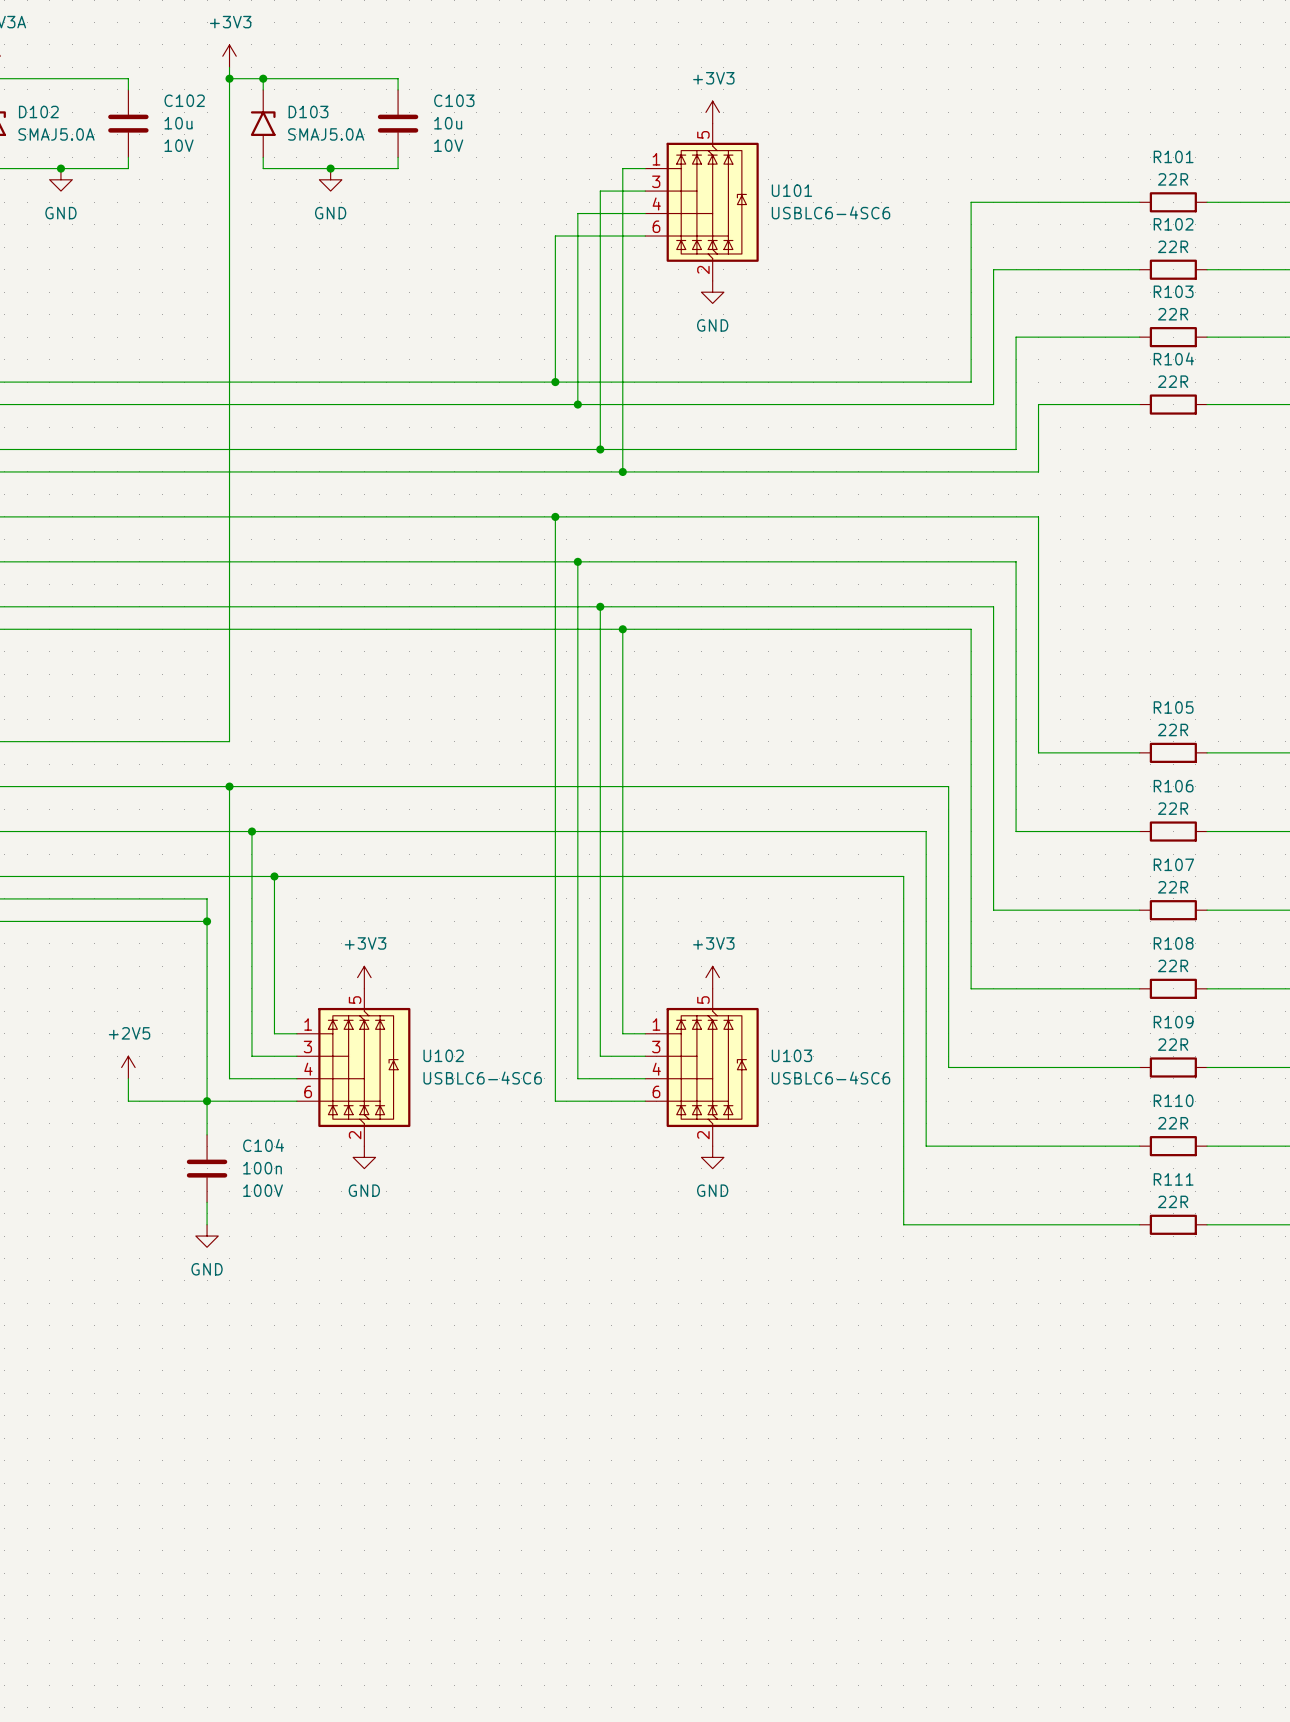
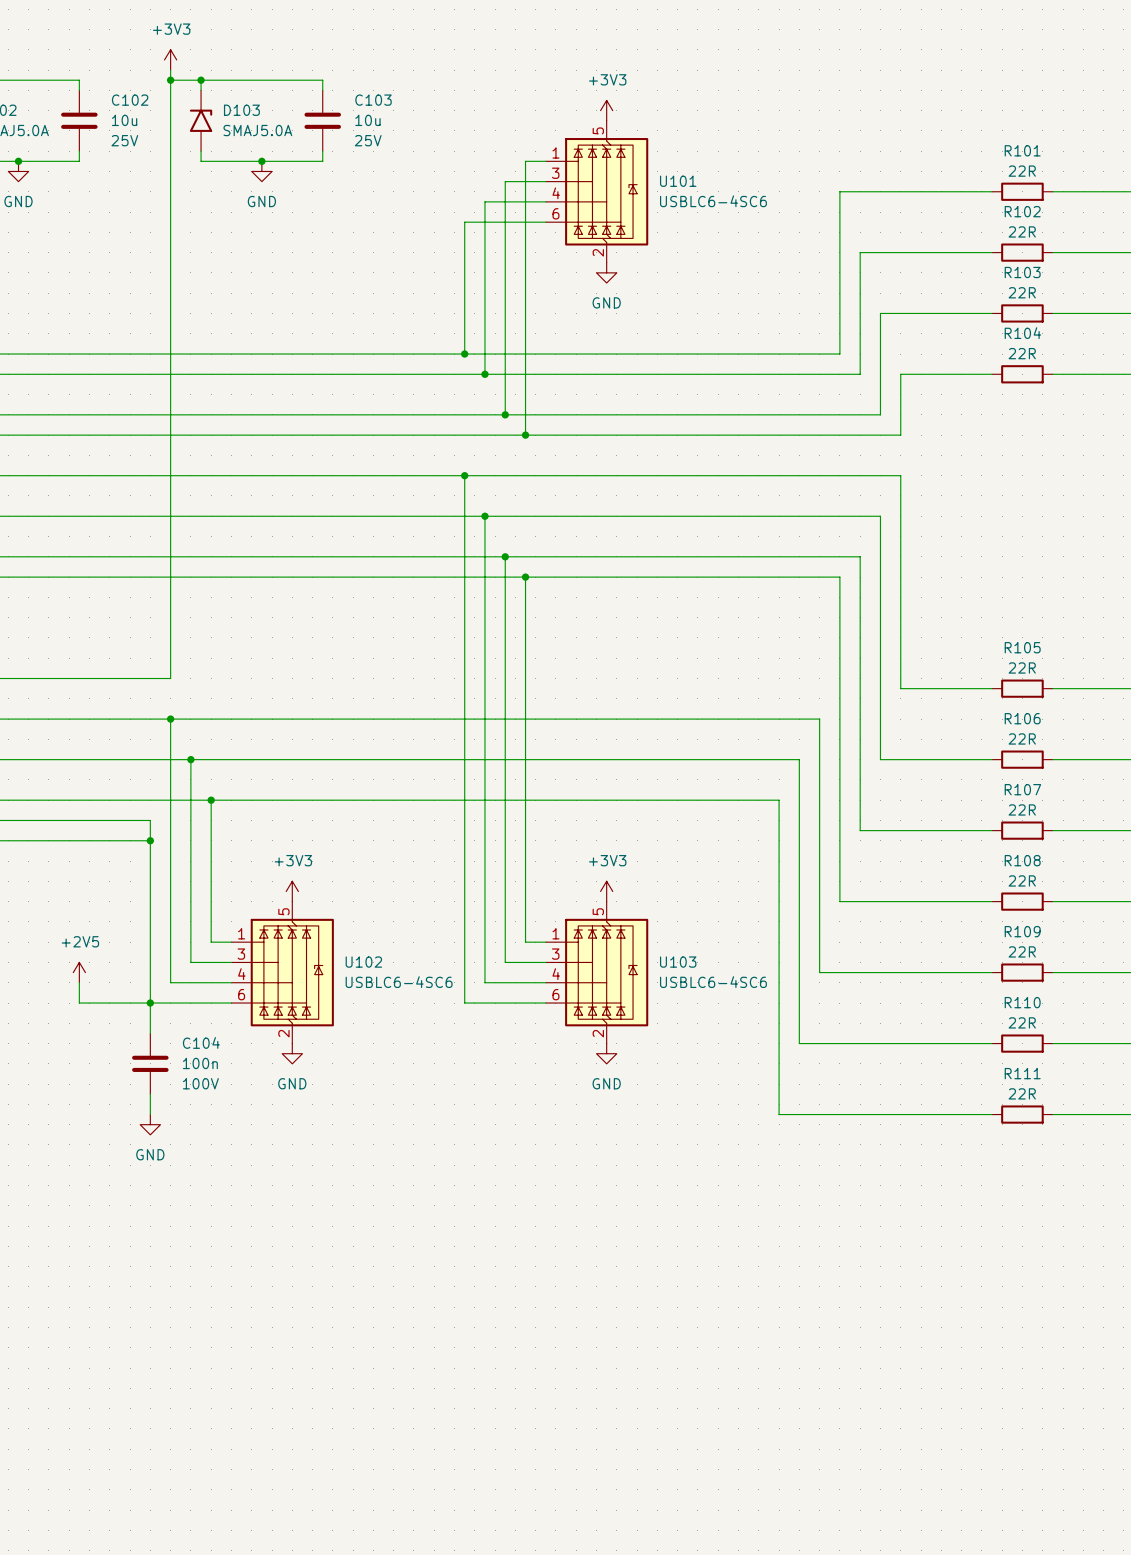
C102 text: 10V (179, 145) -> 25V (124, 140)
C103 text: 10V (448, 145) -> 25V (368, 140)

